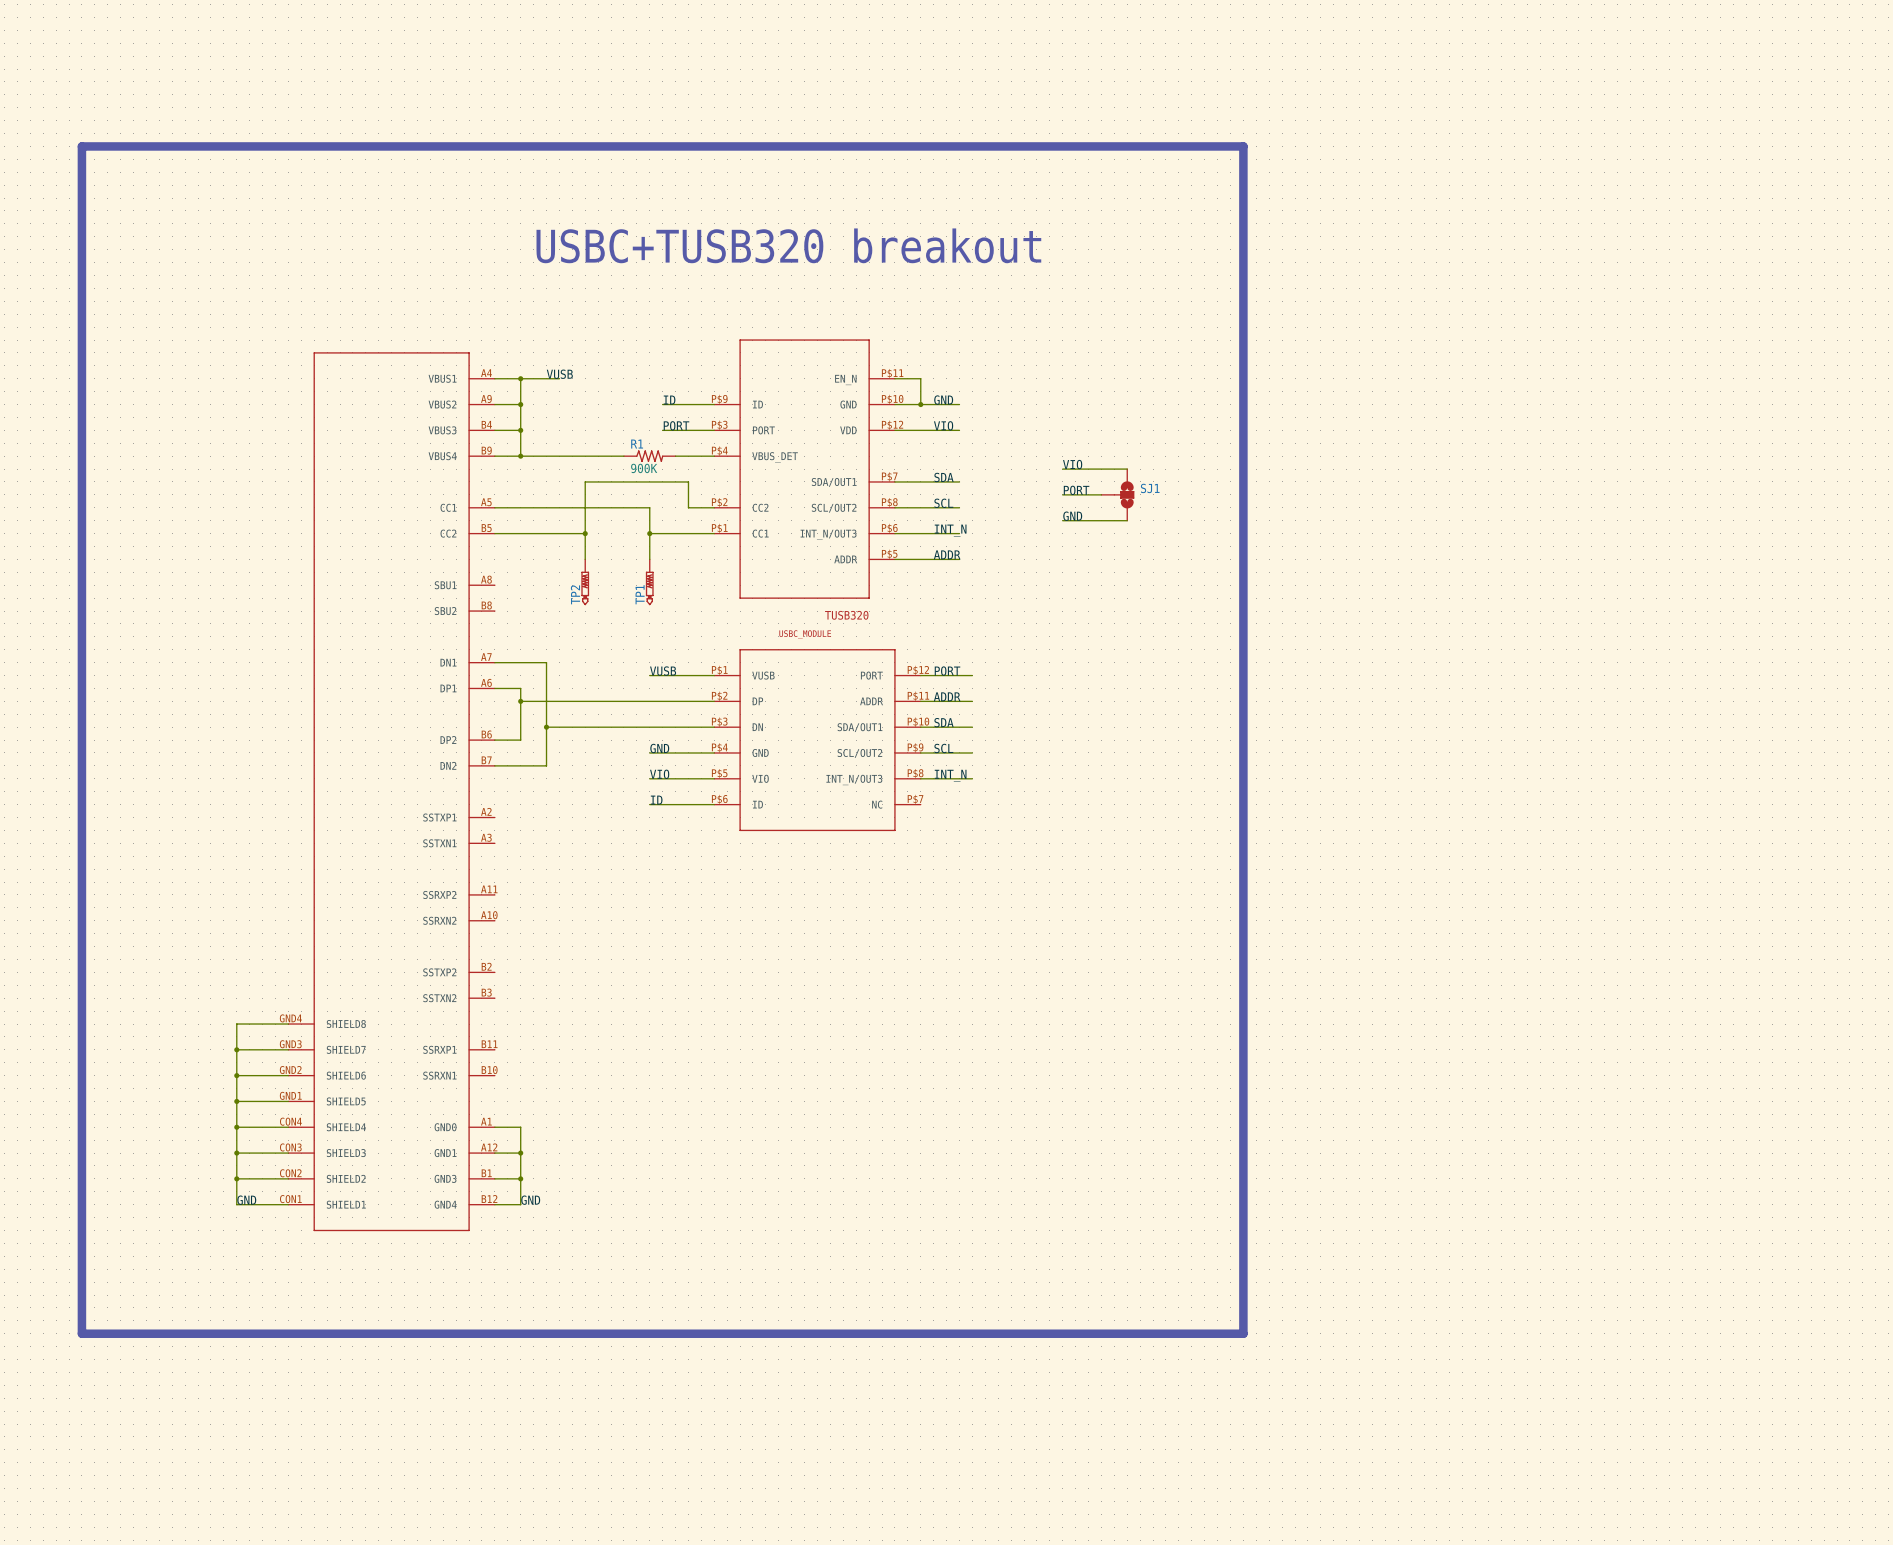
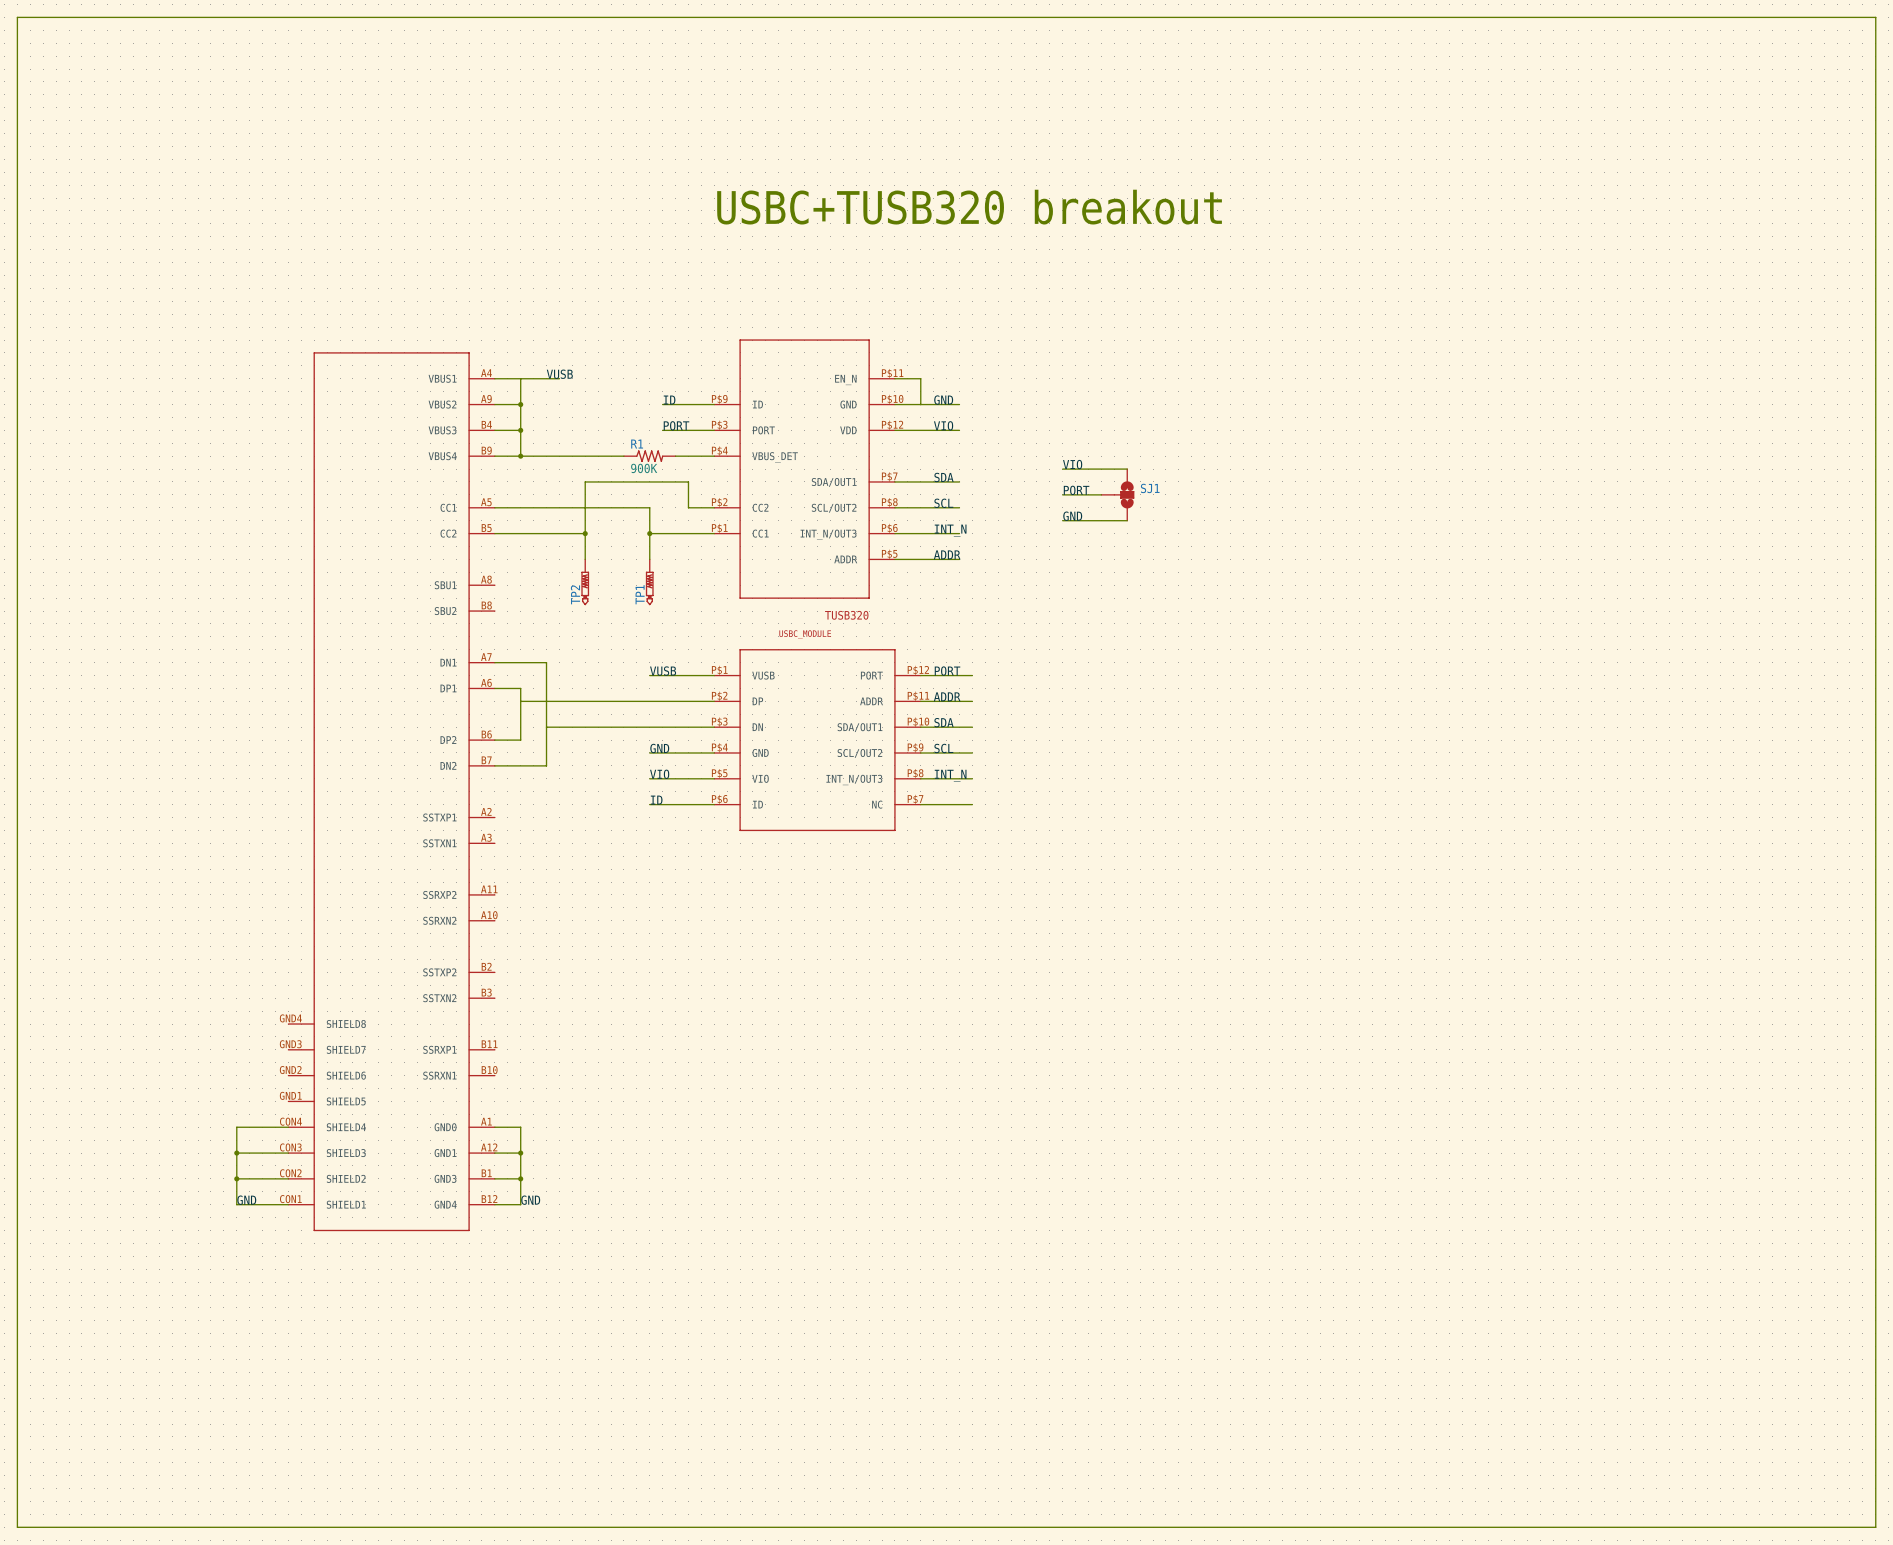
wire: none -> (17, 17) (1875, 17) (1875, 1527) (17, 1527) (17, 17)
line: (81, 146) (1243, 146) (1243, 1333) (81, 1333) (81, 146) -> none
text: none -> USBC+TUSB320 breakout (969, 207)
text: USBC+TUSB320 breakout (788, 245) -> none
junction: (520, 378) -> none
junction: (920, 404) -> none
junction: (520, 701) -> none
junction: (546, 727) -> none
wire: none -> (920, 804) (972, 804)
wire: (288, 1024) (236, 1024) (236, 1127) -> none
wire: (236, 1049) (288, 1049) -> none
junction: (236, 1049) -> none
wire: (236, 1075) (288, 1075) -> none
junction: (236, 1075) -> none
wire: (236, 1101) (288, 1101) -> none
junction: (236, 1101) -> none
junction: (236, 1127) -> none

